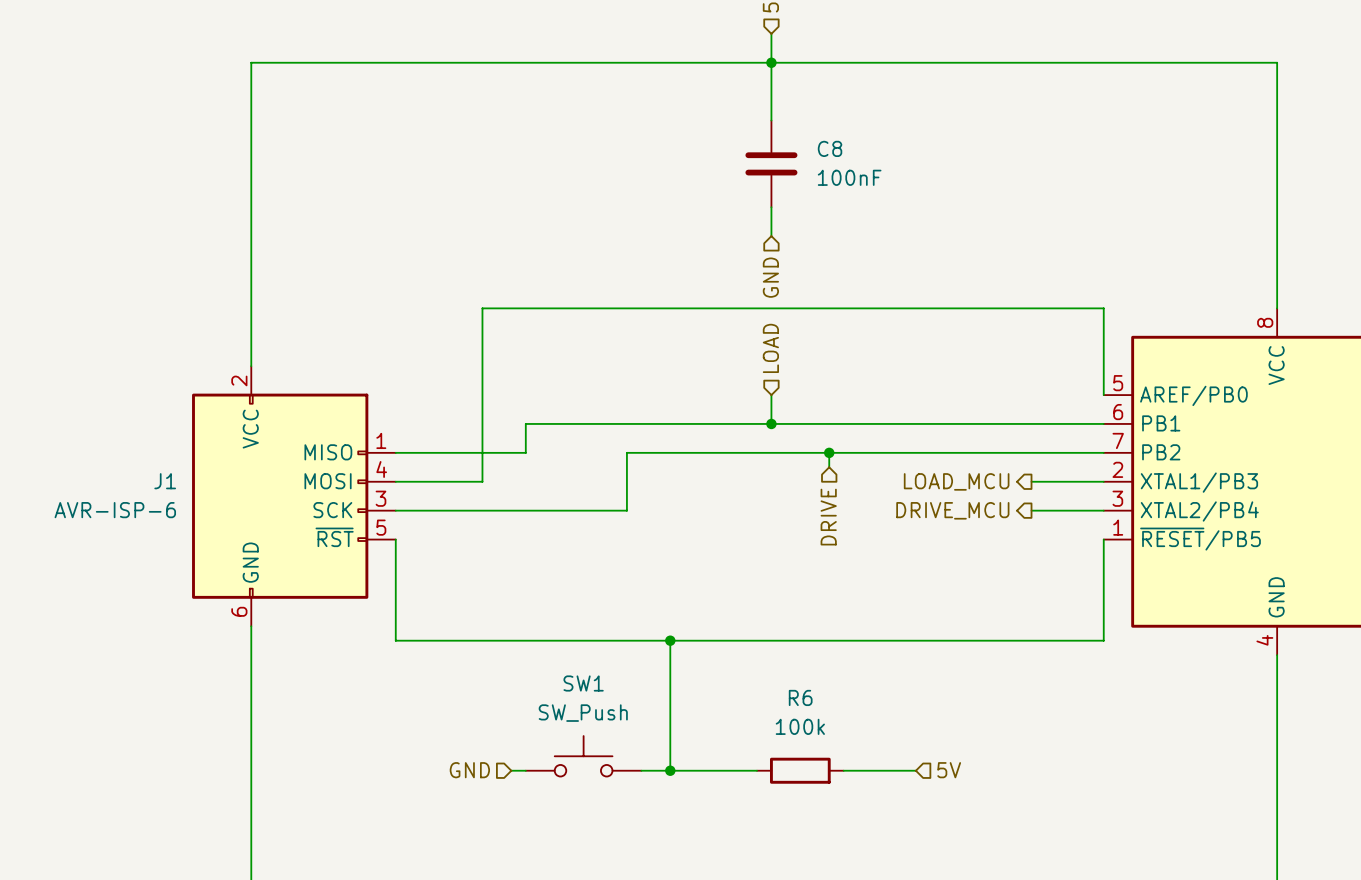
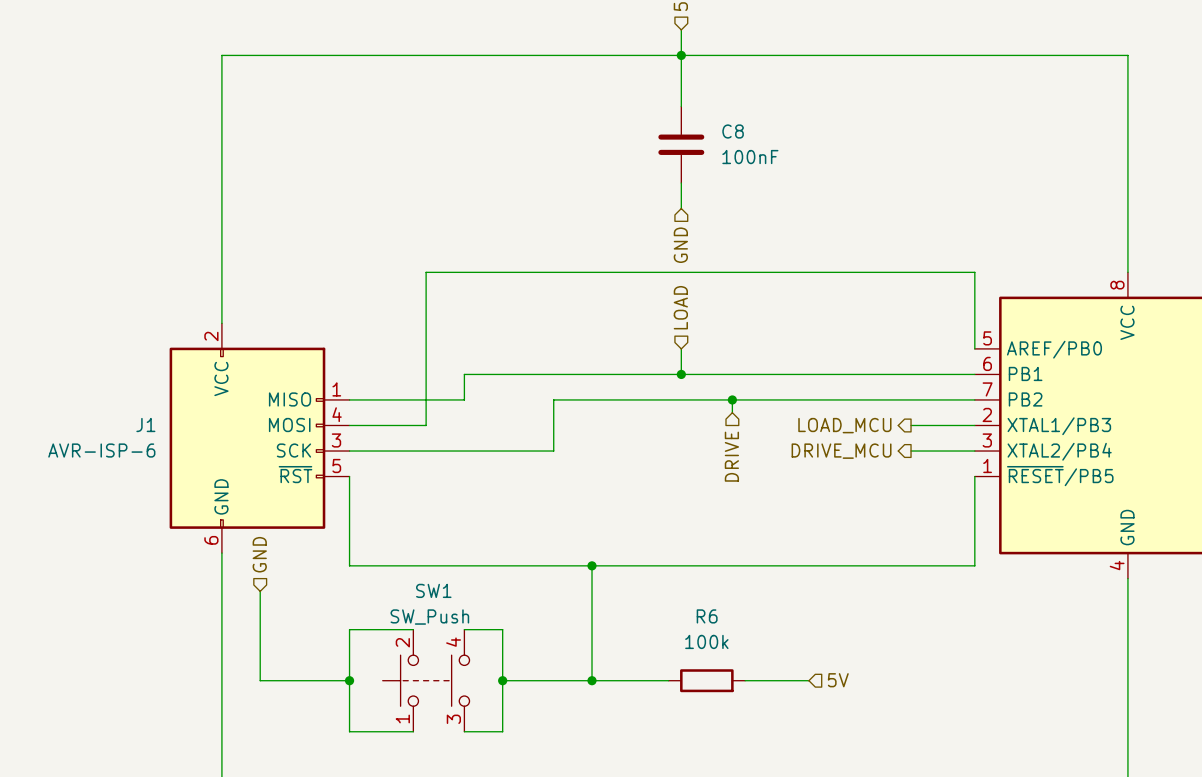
wire: none -> (260, 591) (260, 680) (349, 680)
SW1 name position: SW1 (583, 683) -> SW1 (433, 590)
wire: none -> (413, 629) (349, 629) (349, 731) (413, 731)
wire: none -> (464, 629) (502, 629) (502, 731) (464, 731)
SW1 value position: SW_Push (583, 713) -> SW_Push (429, 617)
SW1 symbol: [525, 736, 642, 777] -> [382, 629, 470, 732]
junction: none -> (349, 680)
hierarchical label rotation: 0° (469, 770) -> 90° clockwise (259, 554)
hierarchical label position: GND (469, 770) -> GND (259, 554)
wire: (511, 770) (525, 770) -> none
wire: none -> (502, 680) (566, 680)
junction: none -> (502, 680)

